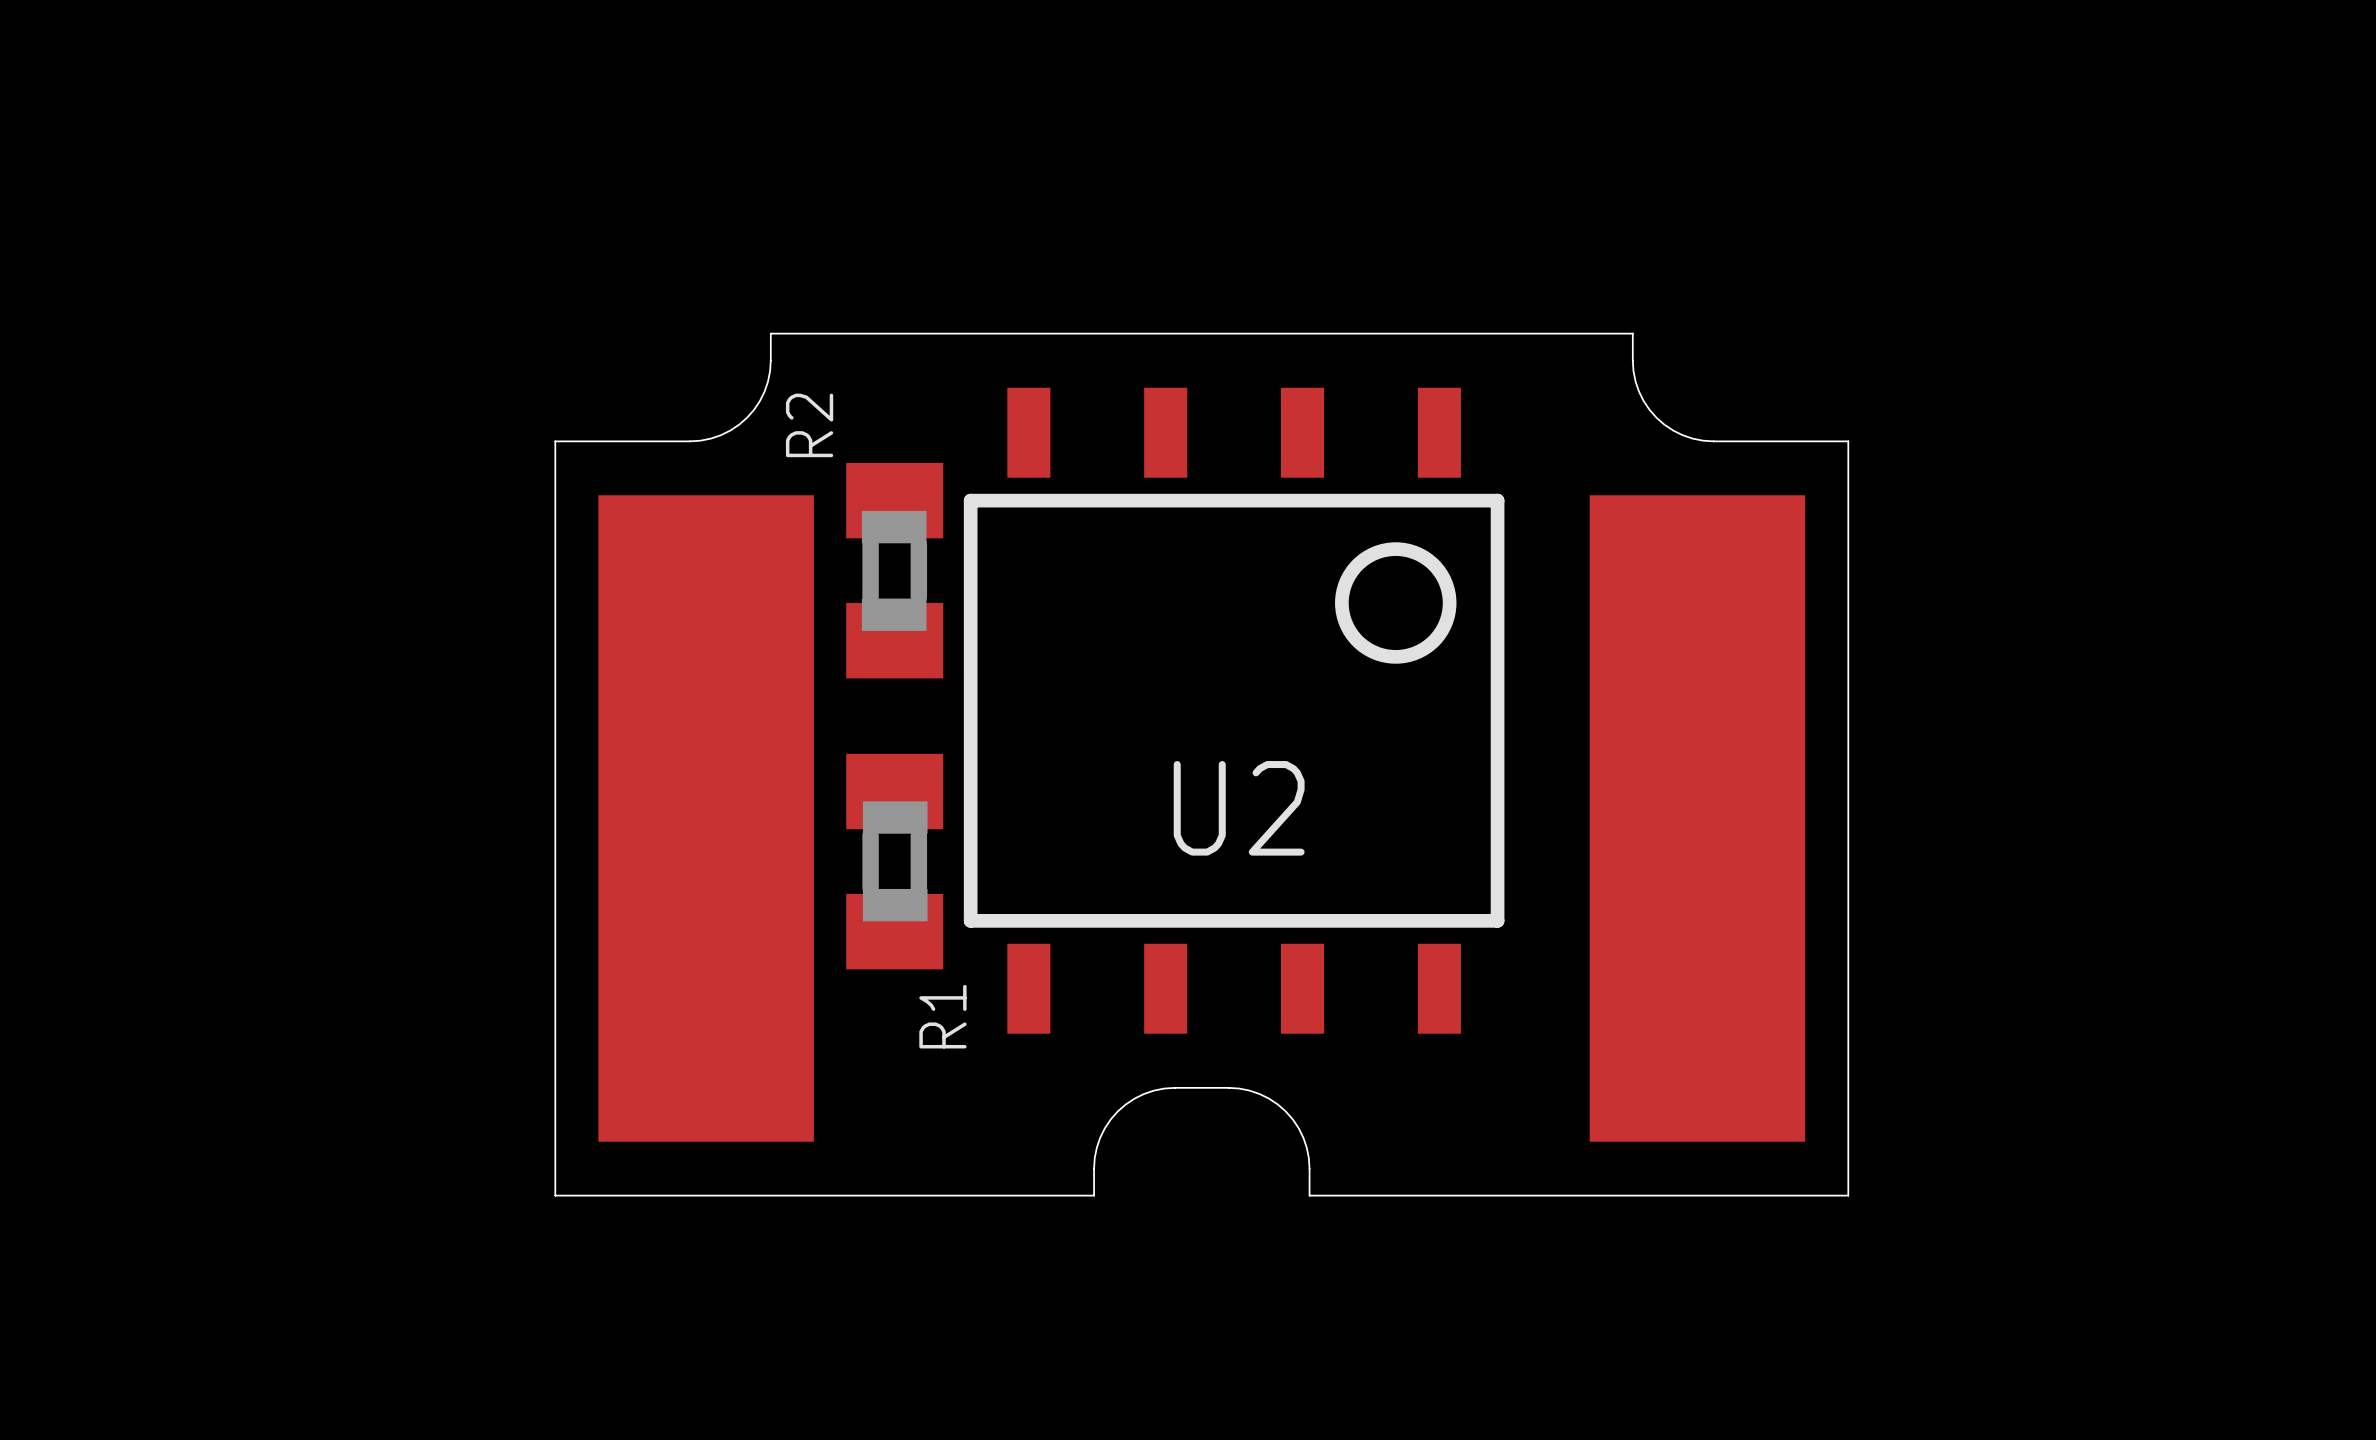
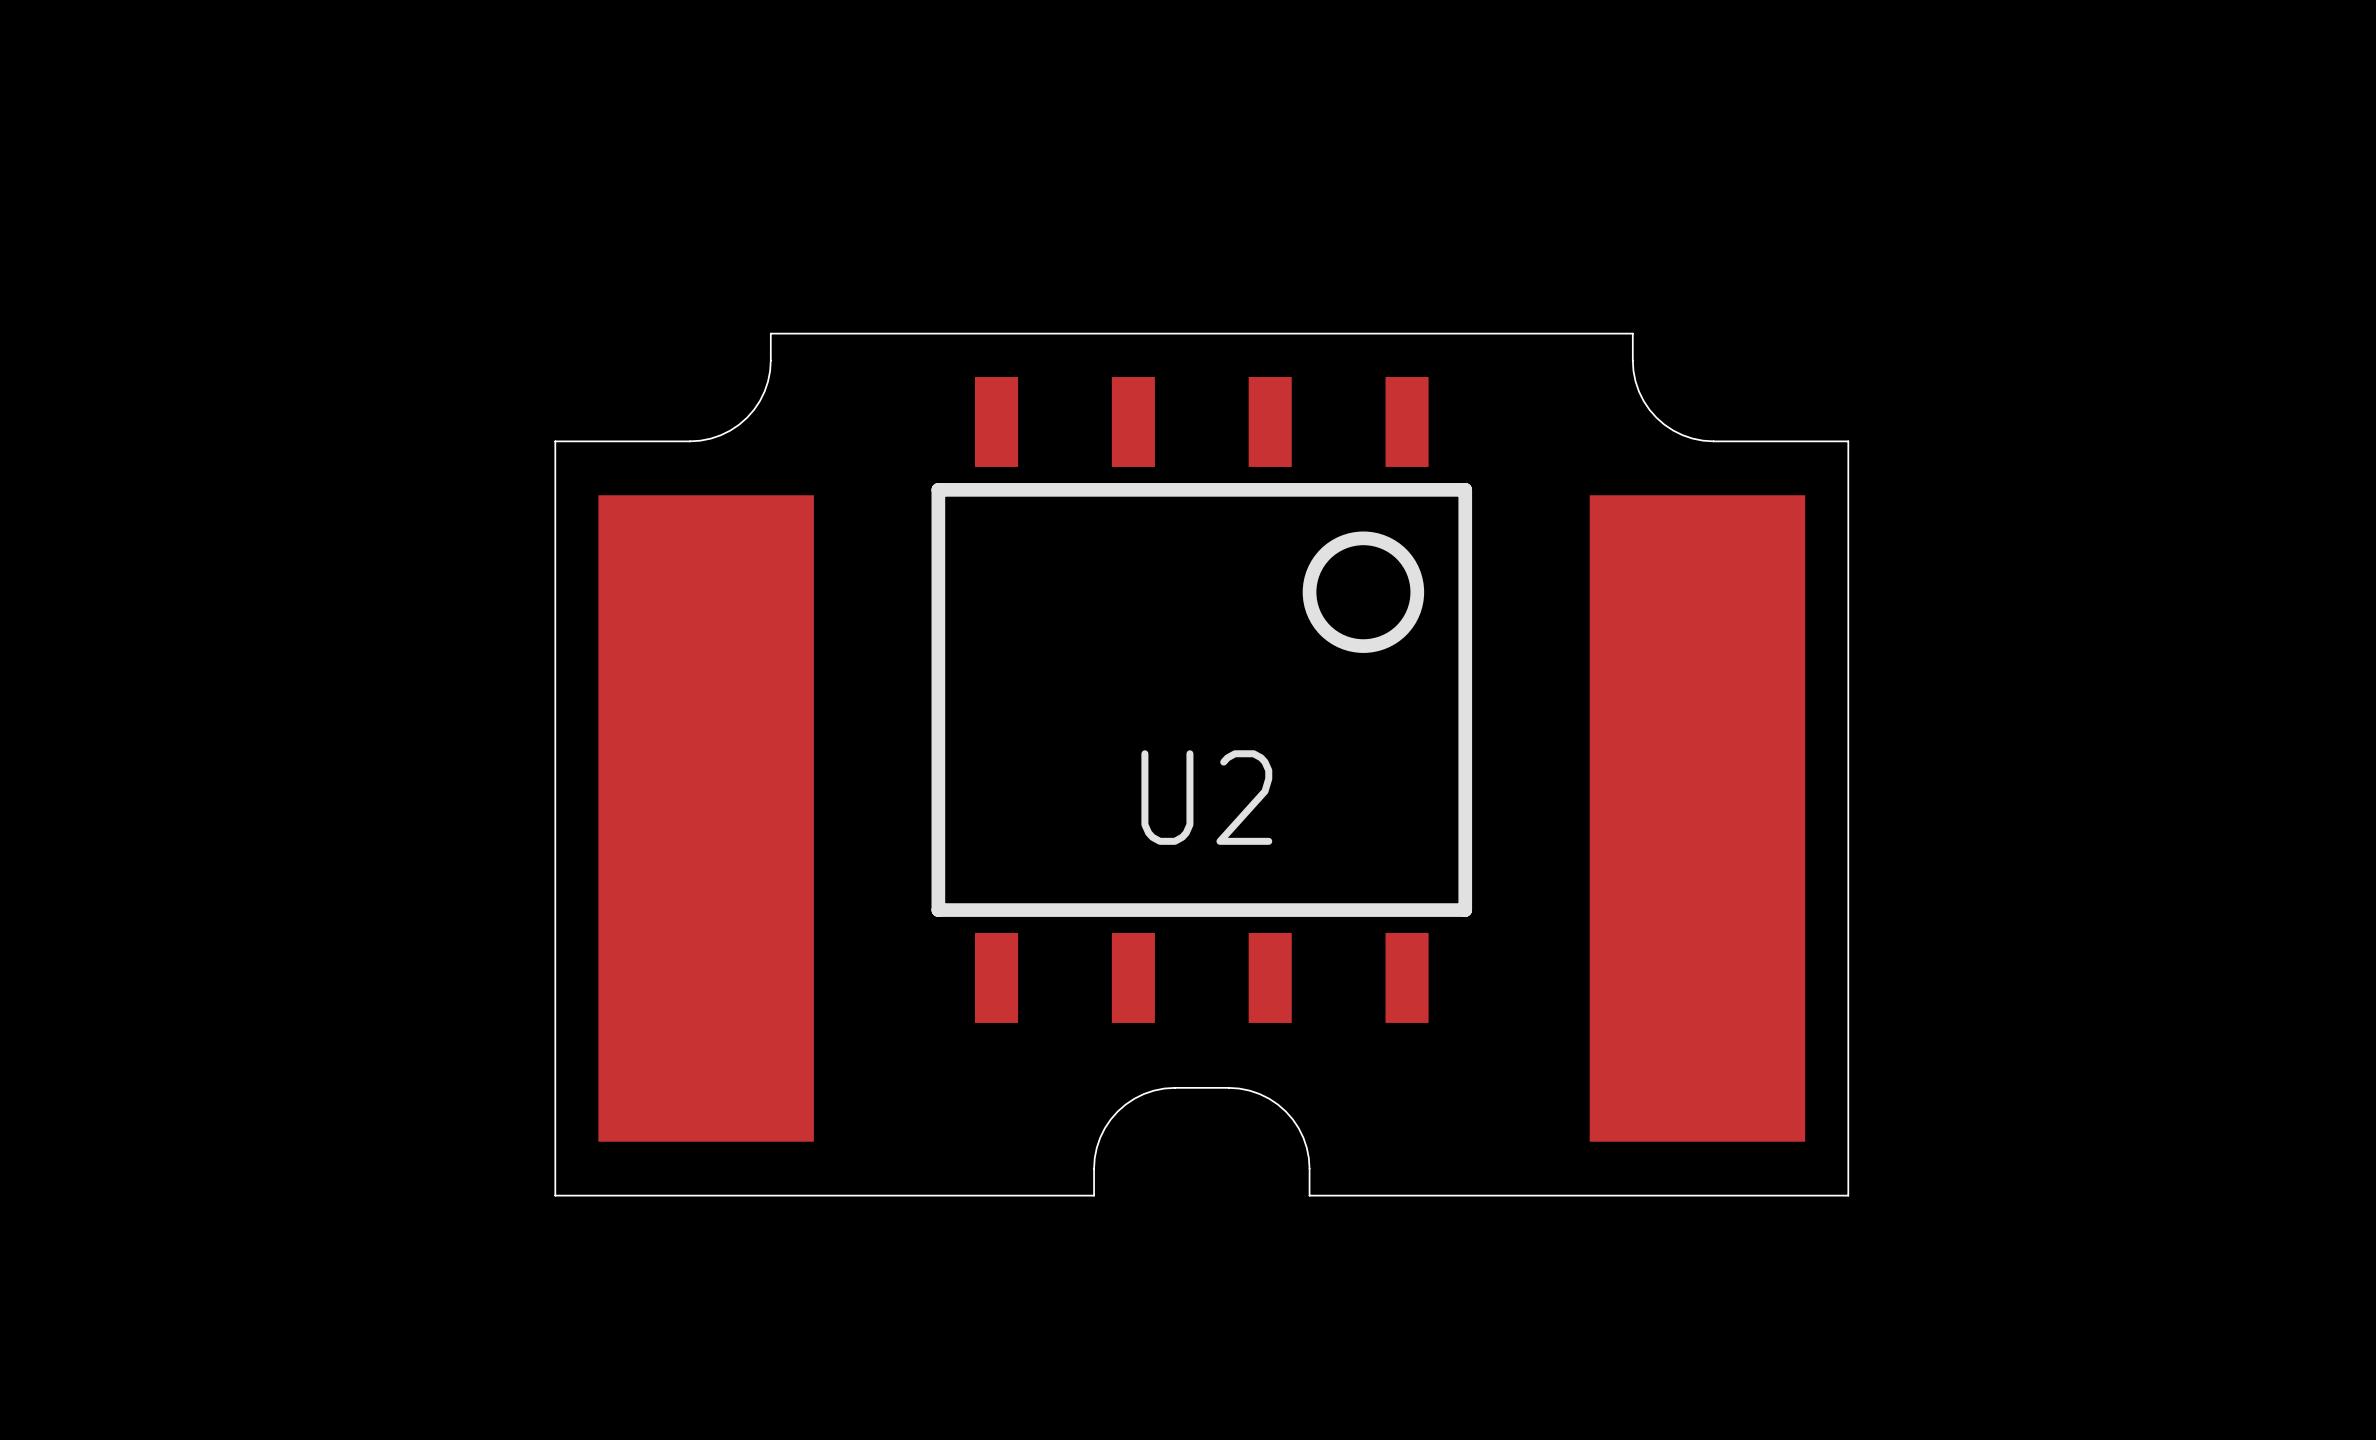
R2: (894, 570) -> none
U2 position: (1234, 710) -> (1201, 699)
R1: (894, 861) -> none

